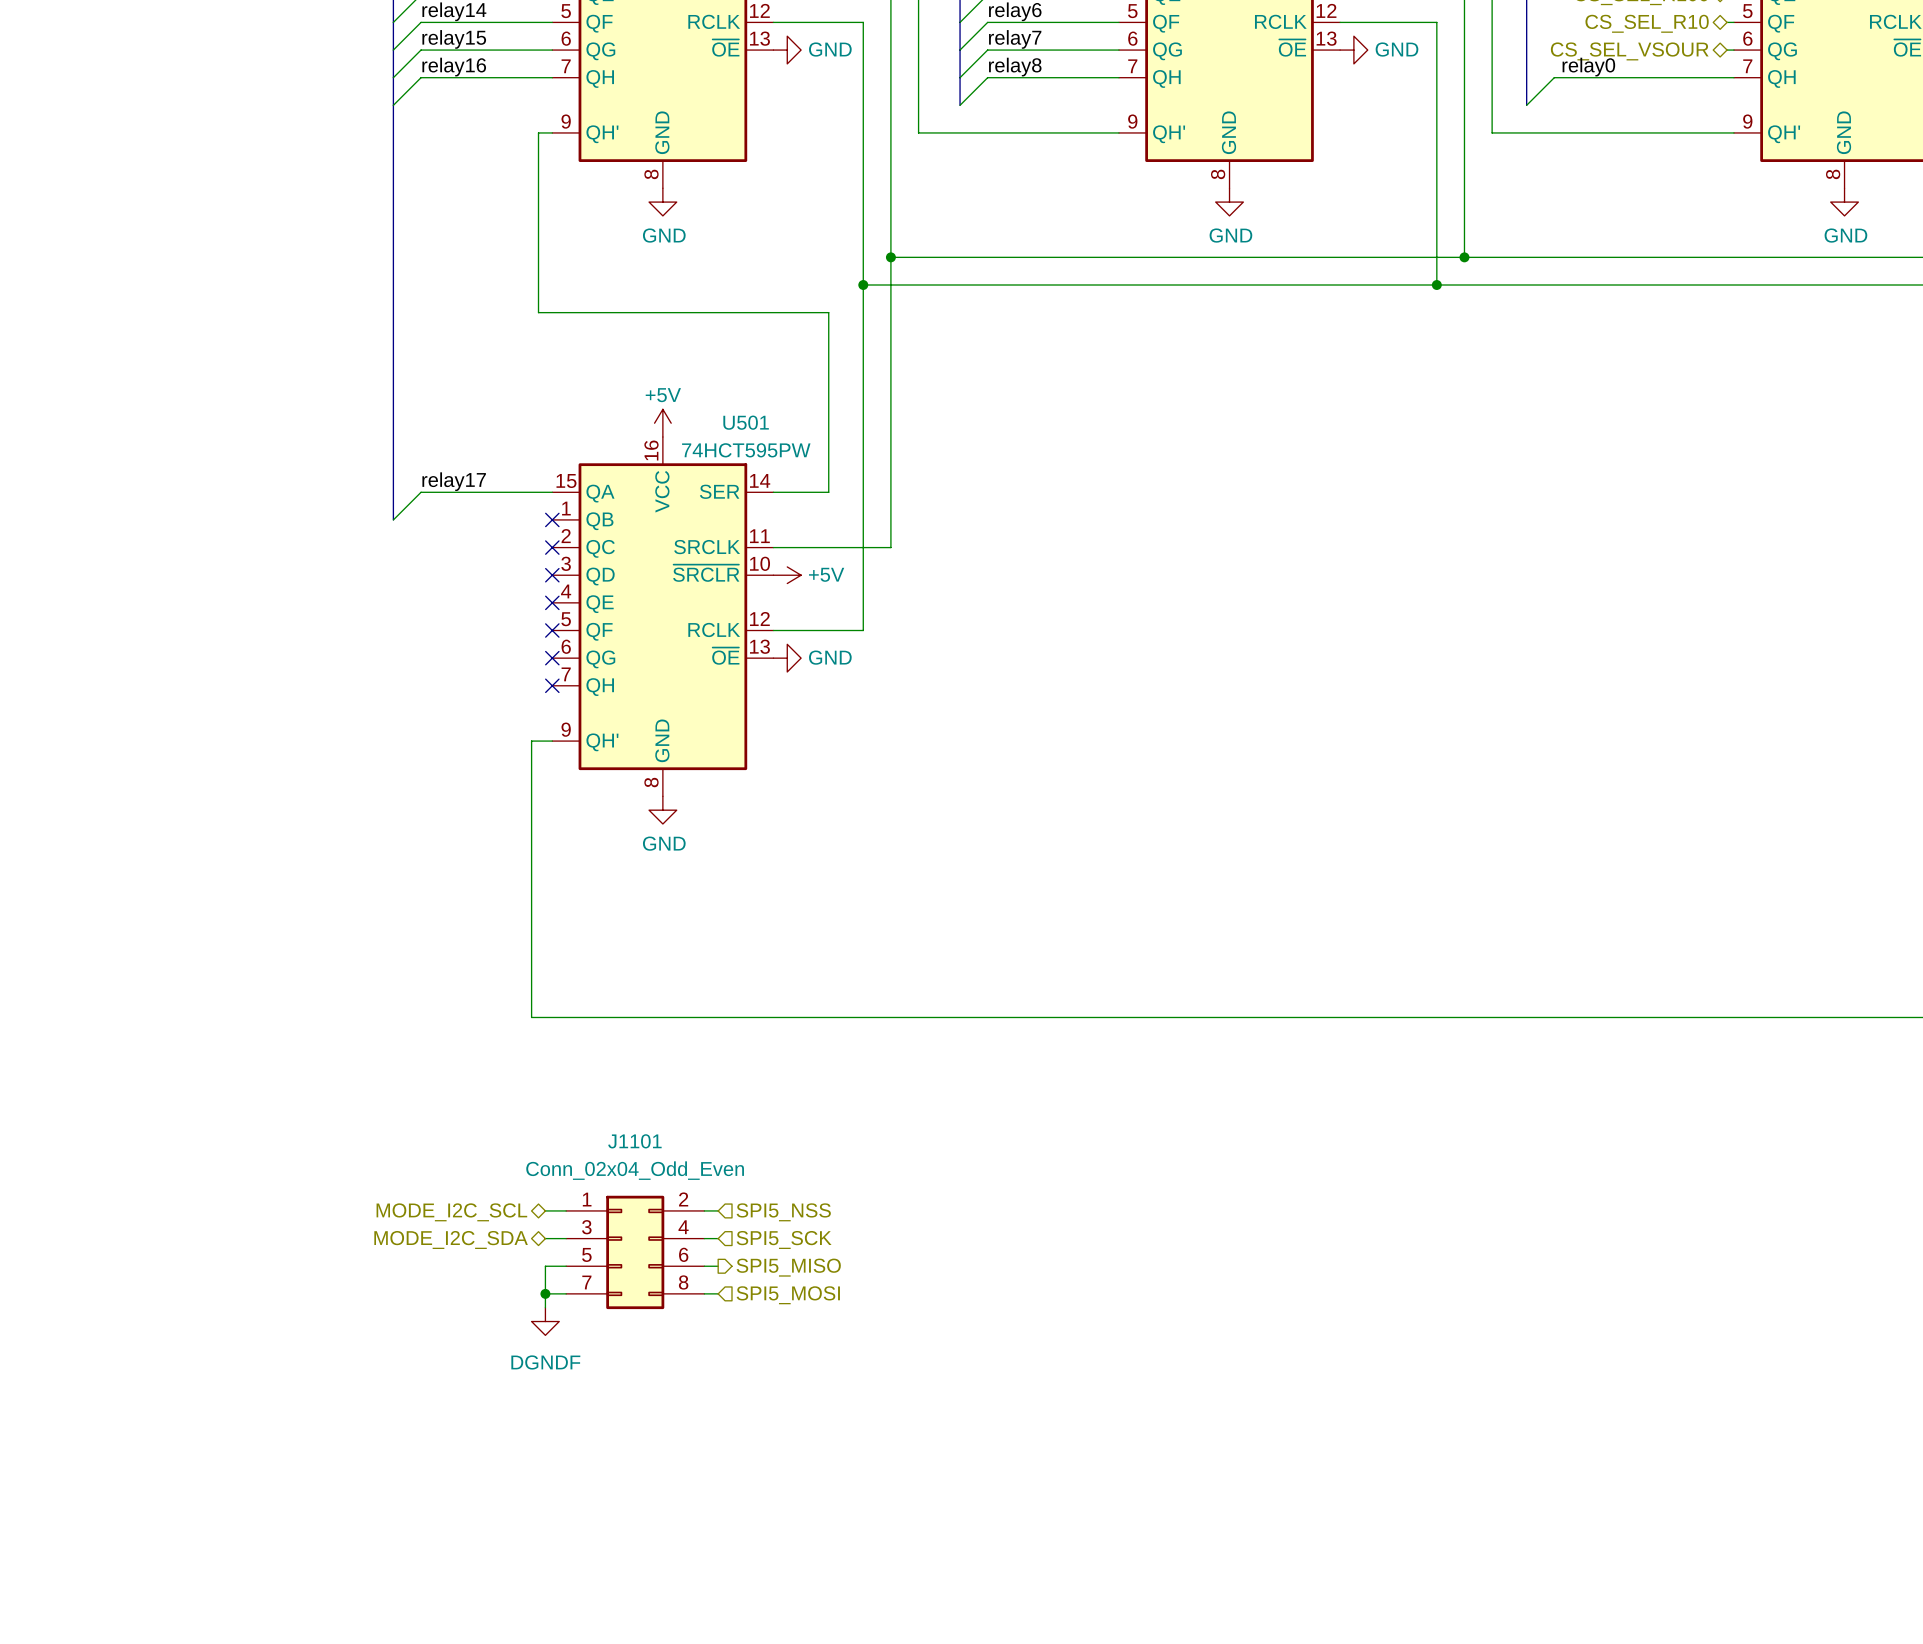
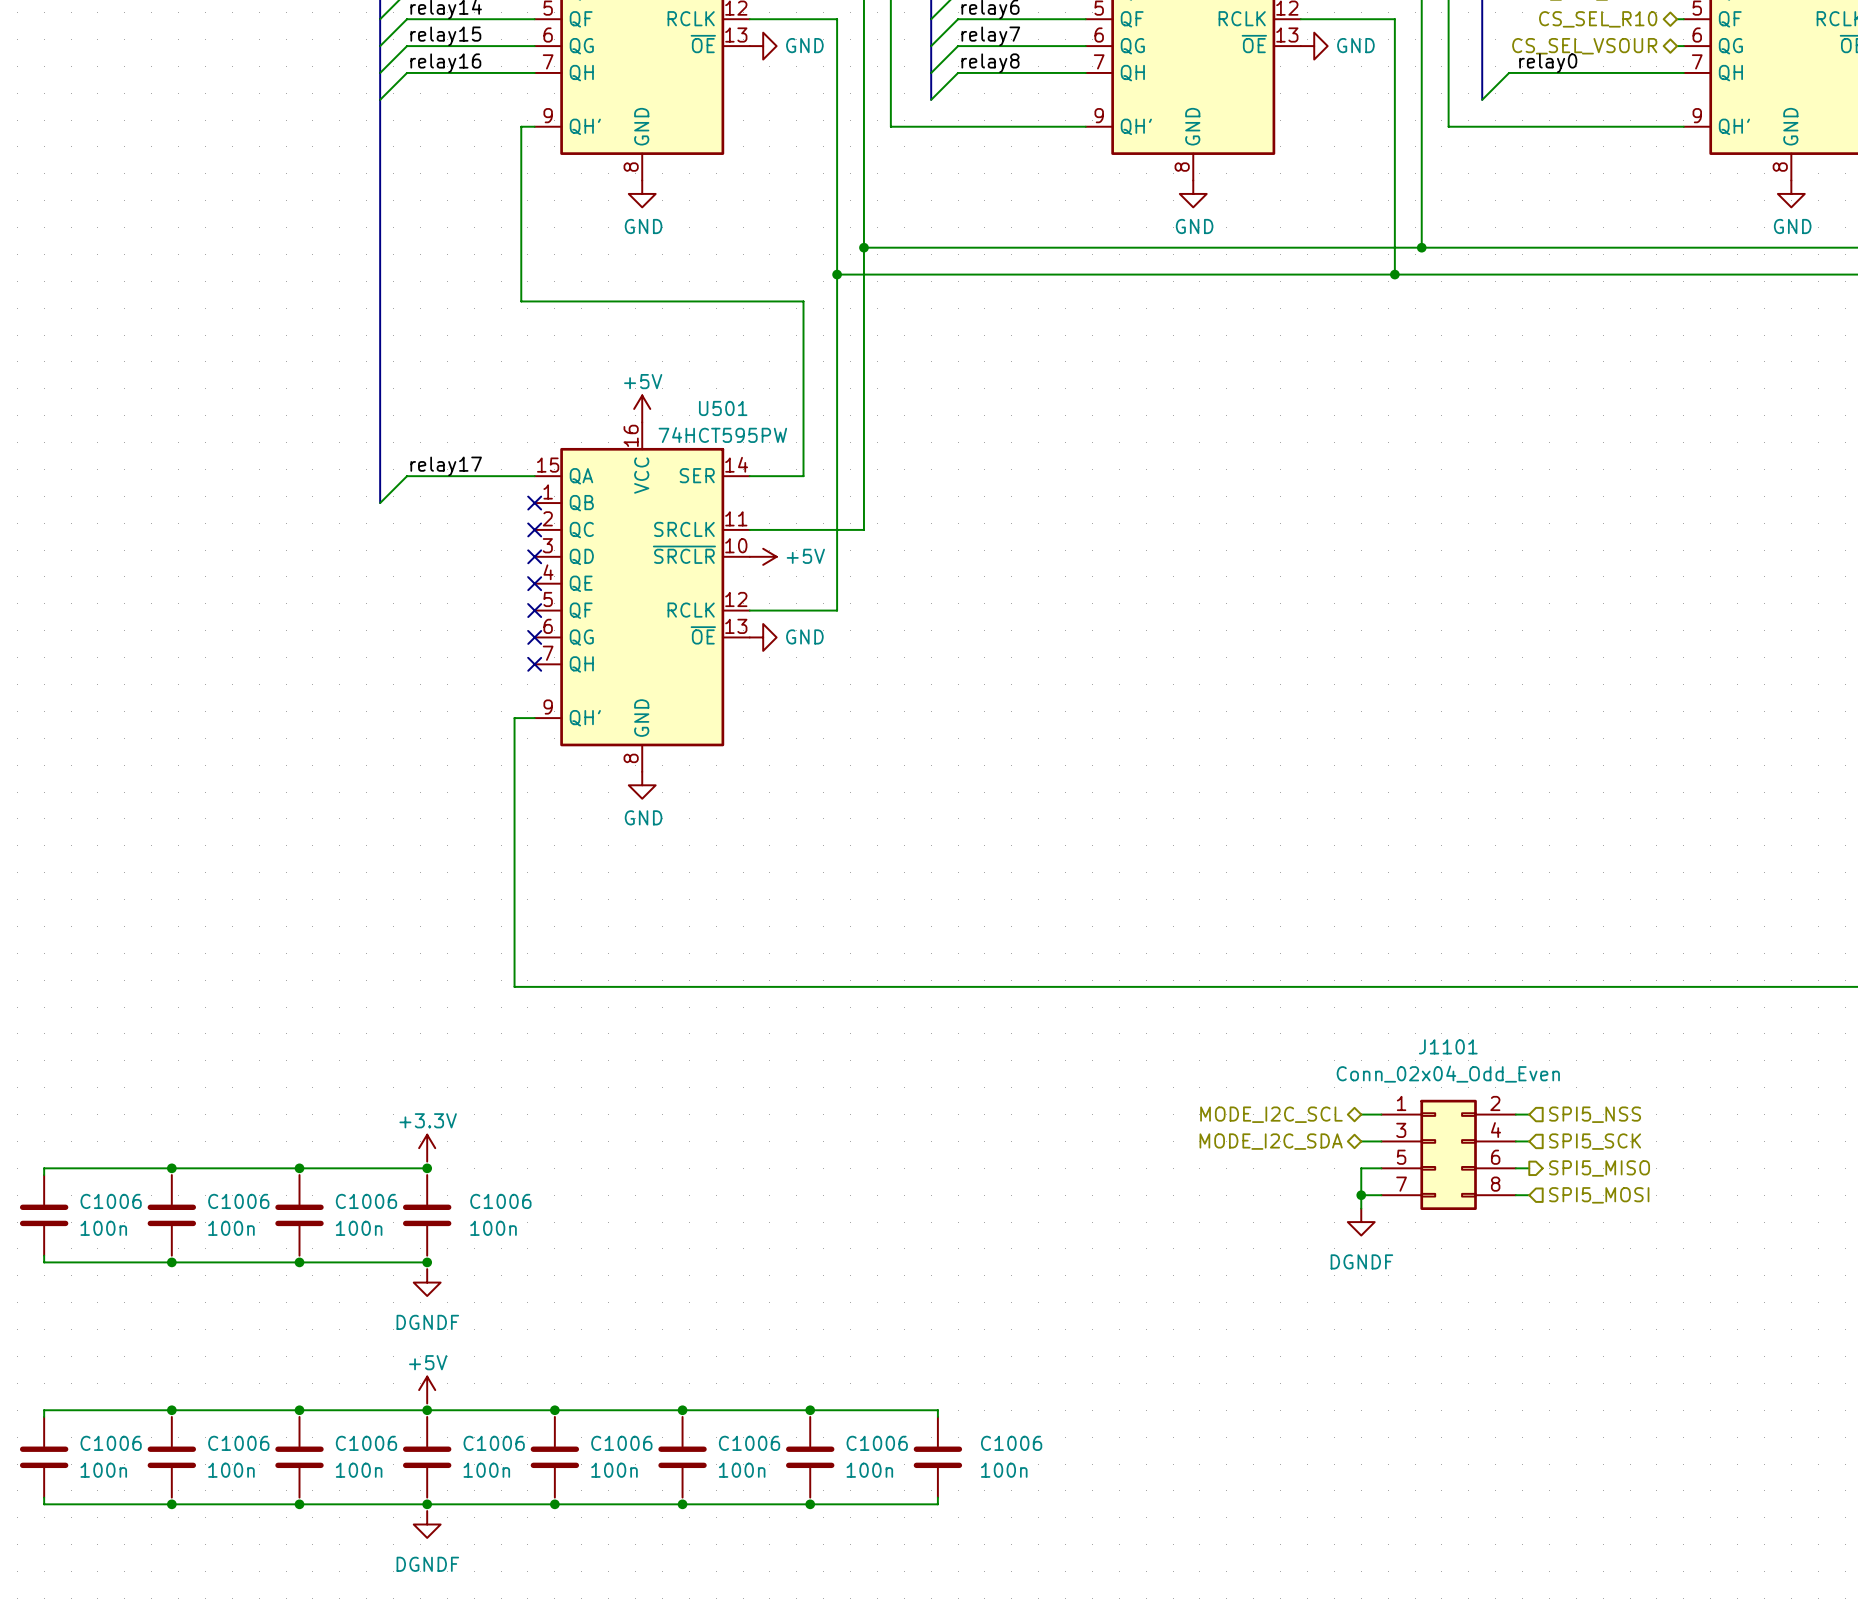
wire: none -> (1361, 1114) (1381, 1114)
wire: none -> (1515, 1114) (1529, 1114)
hierarchical label: none -> MODE_I2C_SCL (1271, 1114)
hierarchical label: none -> SPI5_NSS (1595, 1114)
wire: none -> (1361, 1141) (1381, 1141)
wire: none -> (1515, 1141) (1529, 1141)
hierarchical label: none -> MODE_I2C_SDA (1271, 1141)
hierarchical label: none -> SPI5_SCK (1595, 1141)
power symbol: none -> +3.3V (427, 1148)
junction: none -> (171, 1168)
junction: none -> (299, 1168)
wire: none -> (427, 1168) (44, 1168) (44, 1175)
junction: none -> (427, 1168)
wire: none -> (1381, 1168) (1361, 1168) (1361, 1208)
wire: none -> (1515, 1168) (1529, 1168)
hierarchical label: none -> SPI5_MISO (1599, 1168)
wire: (545, 1210) (566, 1210) -> none
wire: (704, 1210) (718, 1210) -> none
hierarchical label: MODE_I2C_SCL (451, 1212) -> none
hierarchical label: SPI5_NSS (783, 1212) -> none
wire: none -> (1361, 1195) (1381, 1195)
junction: none -> (1361, 1195)
wire: none -> (1515, 1195) (1529, 1195)
hierarchical label: none -> SPI5_MOSI (1599, 1195)
wire: (545, 1238) (566, 1238) -> none
wire: (704, 1238) (718, 1238) -> none
hierarchical label: MODE_I2C_SDA (451, 1239) -> none
hierarchical label: SPI5_SCK (784, 1239) -> none
C1006: none -> 100n (44, 1215)
C1006: none -> 100n (171, 1215)
C1006: none -> 100n (299, 1215)
C1006: none -> 100n (427, 1215)
J1101 position: (635, 1252) -> (1448, 1154)
power symbol: none -> DGNDF (1361, 1222)
wire: (566, 1266) (545, 1266) (545, 1307) -> none
wire: (704, 1266) (718, 1266) -> none
hierarchical label: SPI5_MISO (788, 1267) -> none
wire: none -> (44, 1255) (44, 1262) (427, 1262)
wire: (545, 1293) (566, 1293) -> none
junction: (545, 1293) -> none
wire: (704, 1293) (718, 1293) -> none
hierarchical label: SPI5_MOSI (788, 1295) -> none
junction: none -> (171, 1262)
junction: none -> (299, 1262)
junction: none -> (427, 1262)
power symbol position: DGNDF (545, 1321) -> DGNDF (427, 1282)
power symbol: none -> +5V (427, 1390)
junction: none -> (171, 1410)
junction: none -> (299, 1410)
junction: none -> (427, 1410)
junction: none -> (554, 1410)
junction: none -> (682, 1410)
junction: none -> (810, 1410)
wire: none -> (44, 1416) (44, 1410) (937, 1410) (937, 1416)
C1006: none -> 100n (44, 1457)
C1006: none -> 100n (171, 1457)
C1006: none -> 100n (299, 1457)
C1006: none -> 100n (427, 1457)
C1006: none -> 100n (554, 1457)
C1006: none -> 100n (682, 1457)
C1006: none -> 100n (810, 1457)
C1006: none -> 100n (937, 1457)
wire: none -> (44, 1497) (44, 1504) (937, 1504) (937, 1497)
junction: none -> (171, 1504)
junction: none -> (299, 1504)
junction: none -> (427, 1504)
junction: none -> (554, 1504)
junction: none -> (682, 1504)
junction: none -> (810, 1504)
power symbol: none -> DGNDF (427, 1524)

